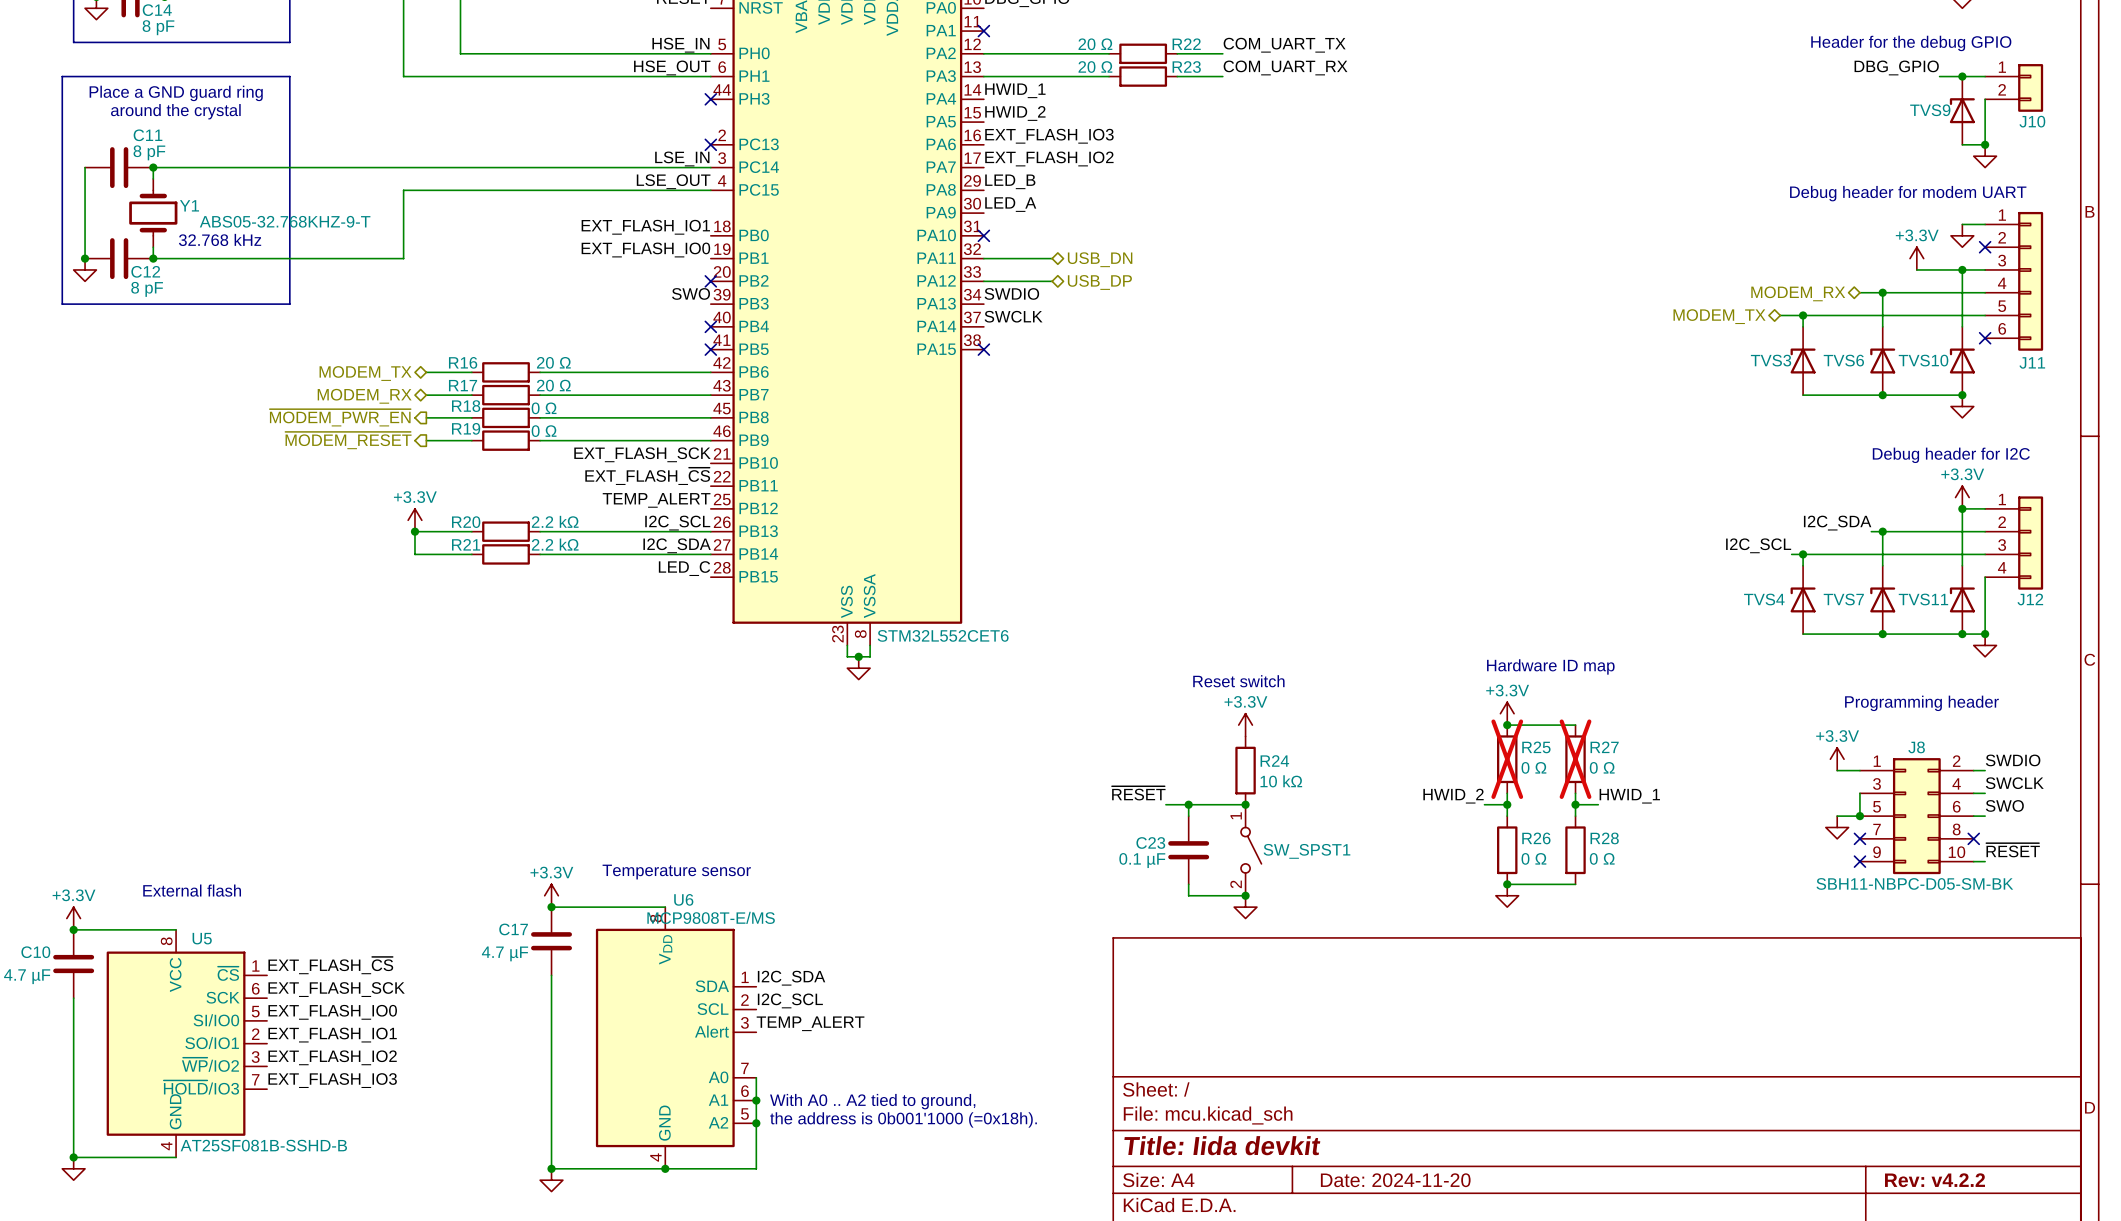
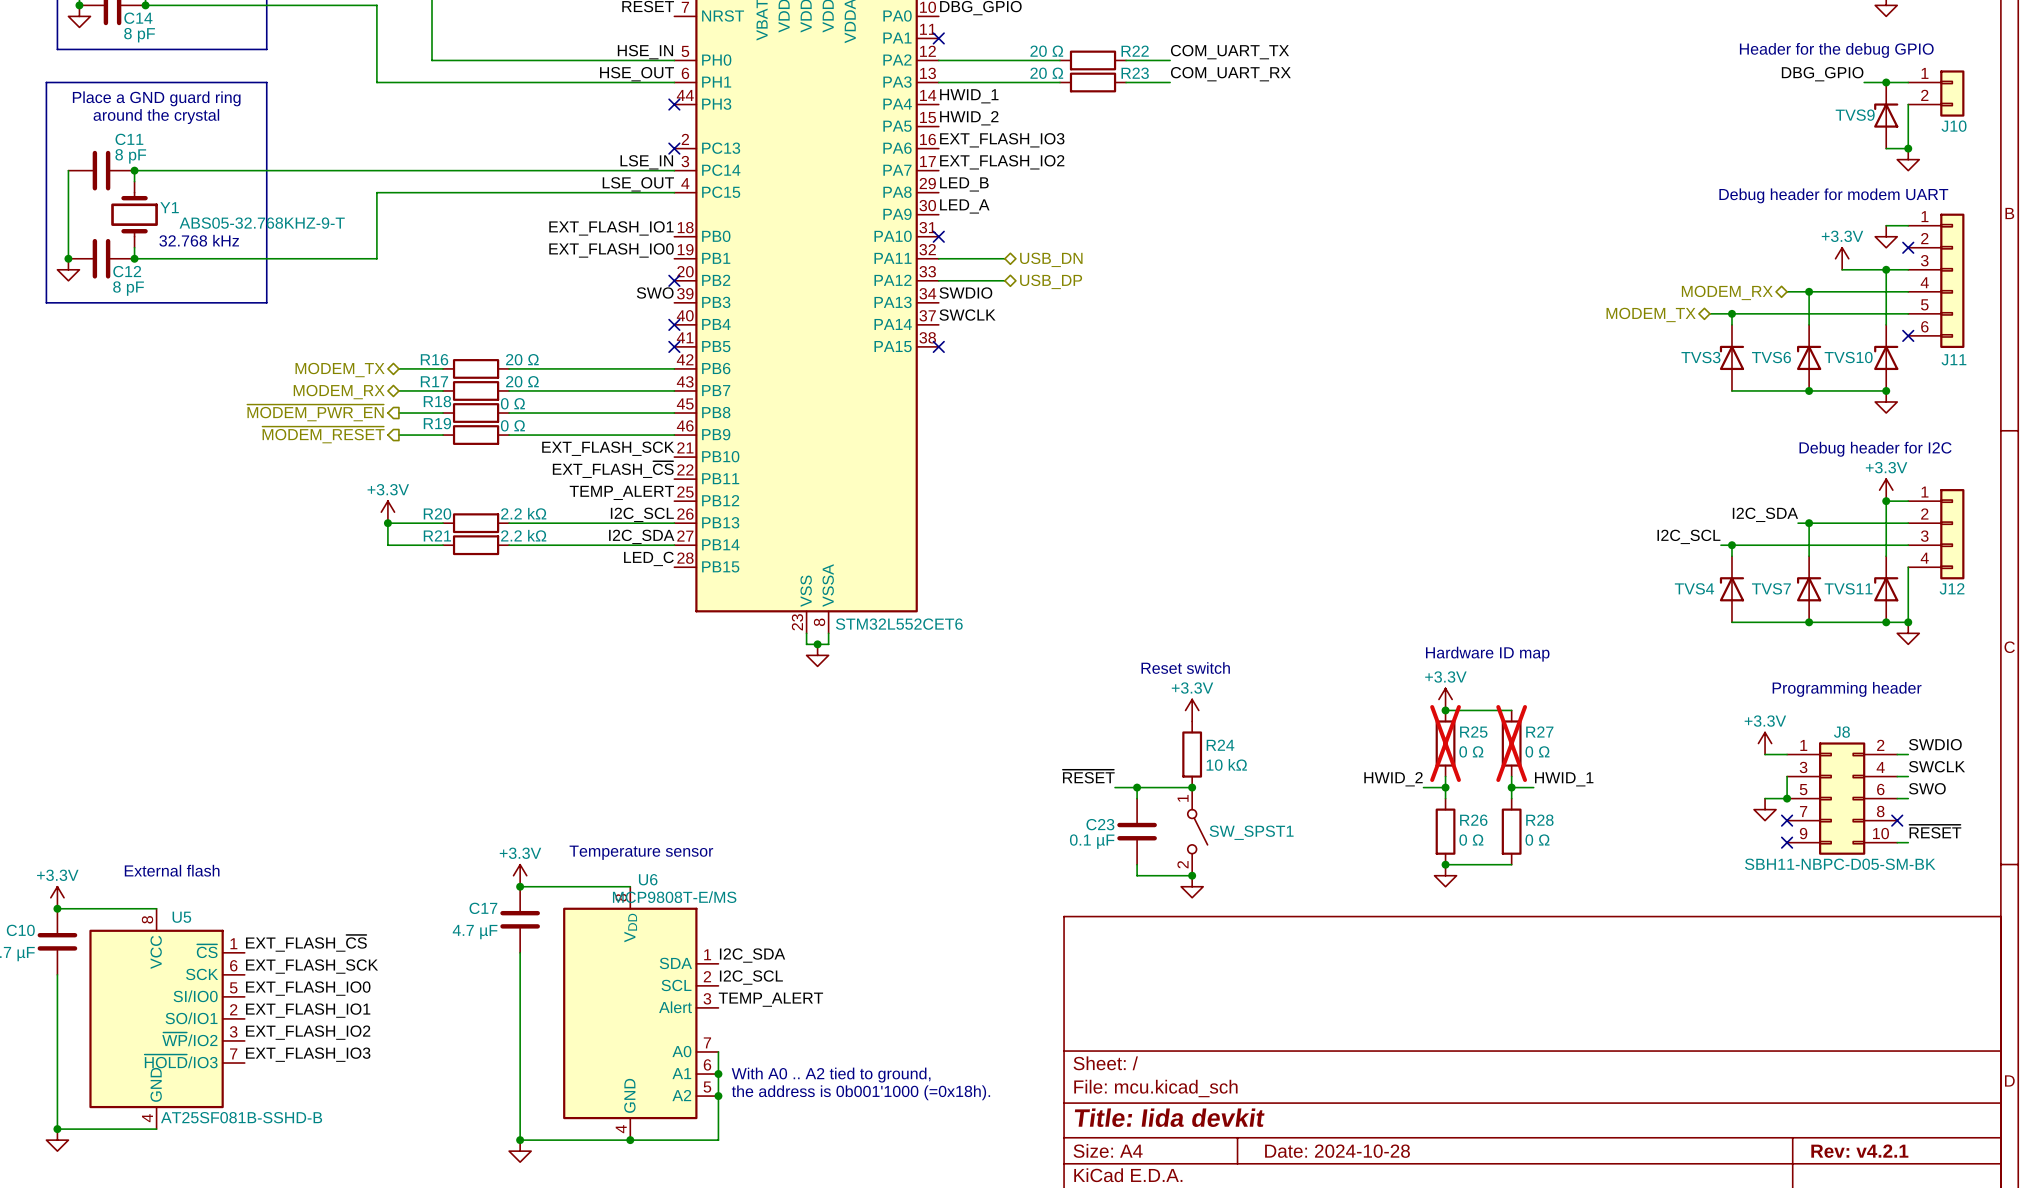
title block: Date: 2024-11-20 (1395, 1180) -> Date: 2024-10-28 (1337, 1151)
title block: Rev: v4.2.2 (1935, 1180) -> Rev: v4.2.1 (1859, 1151)

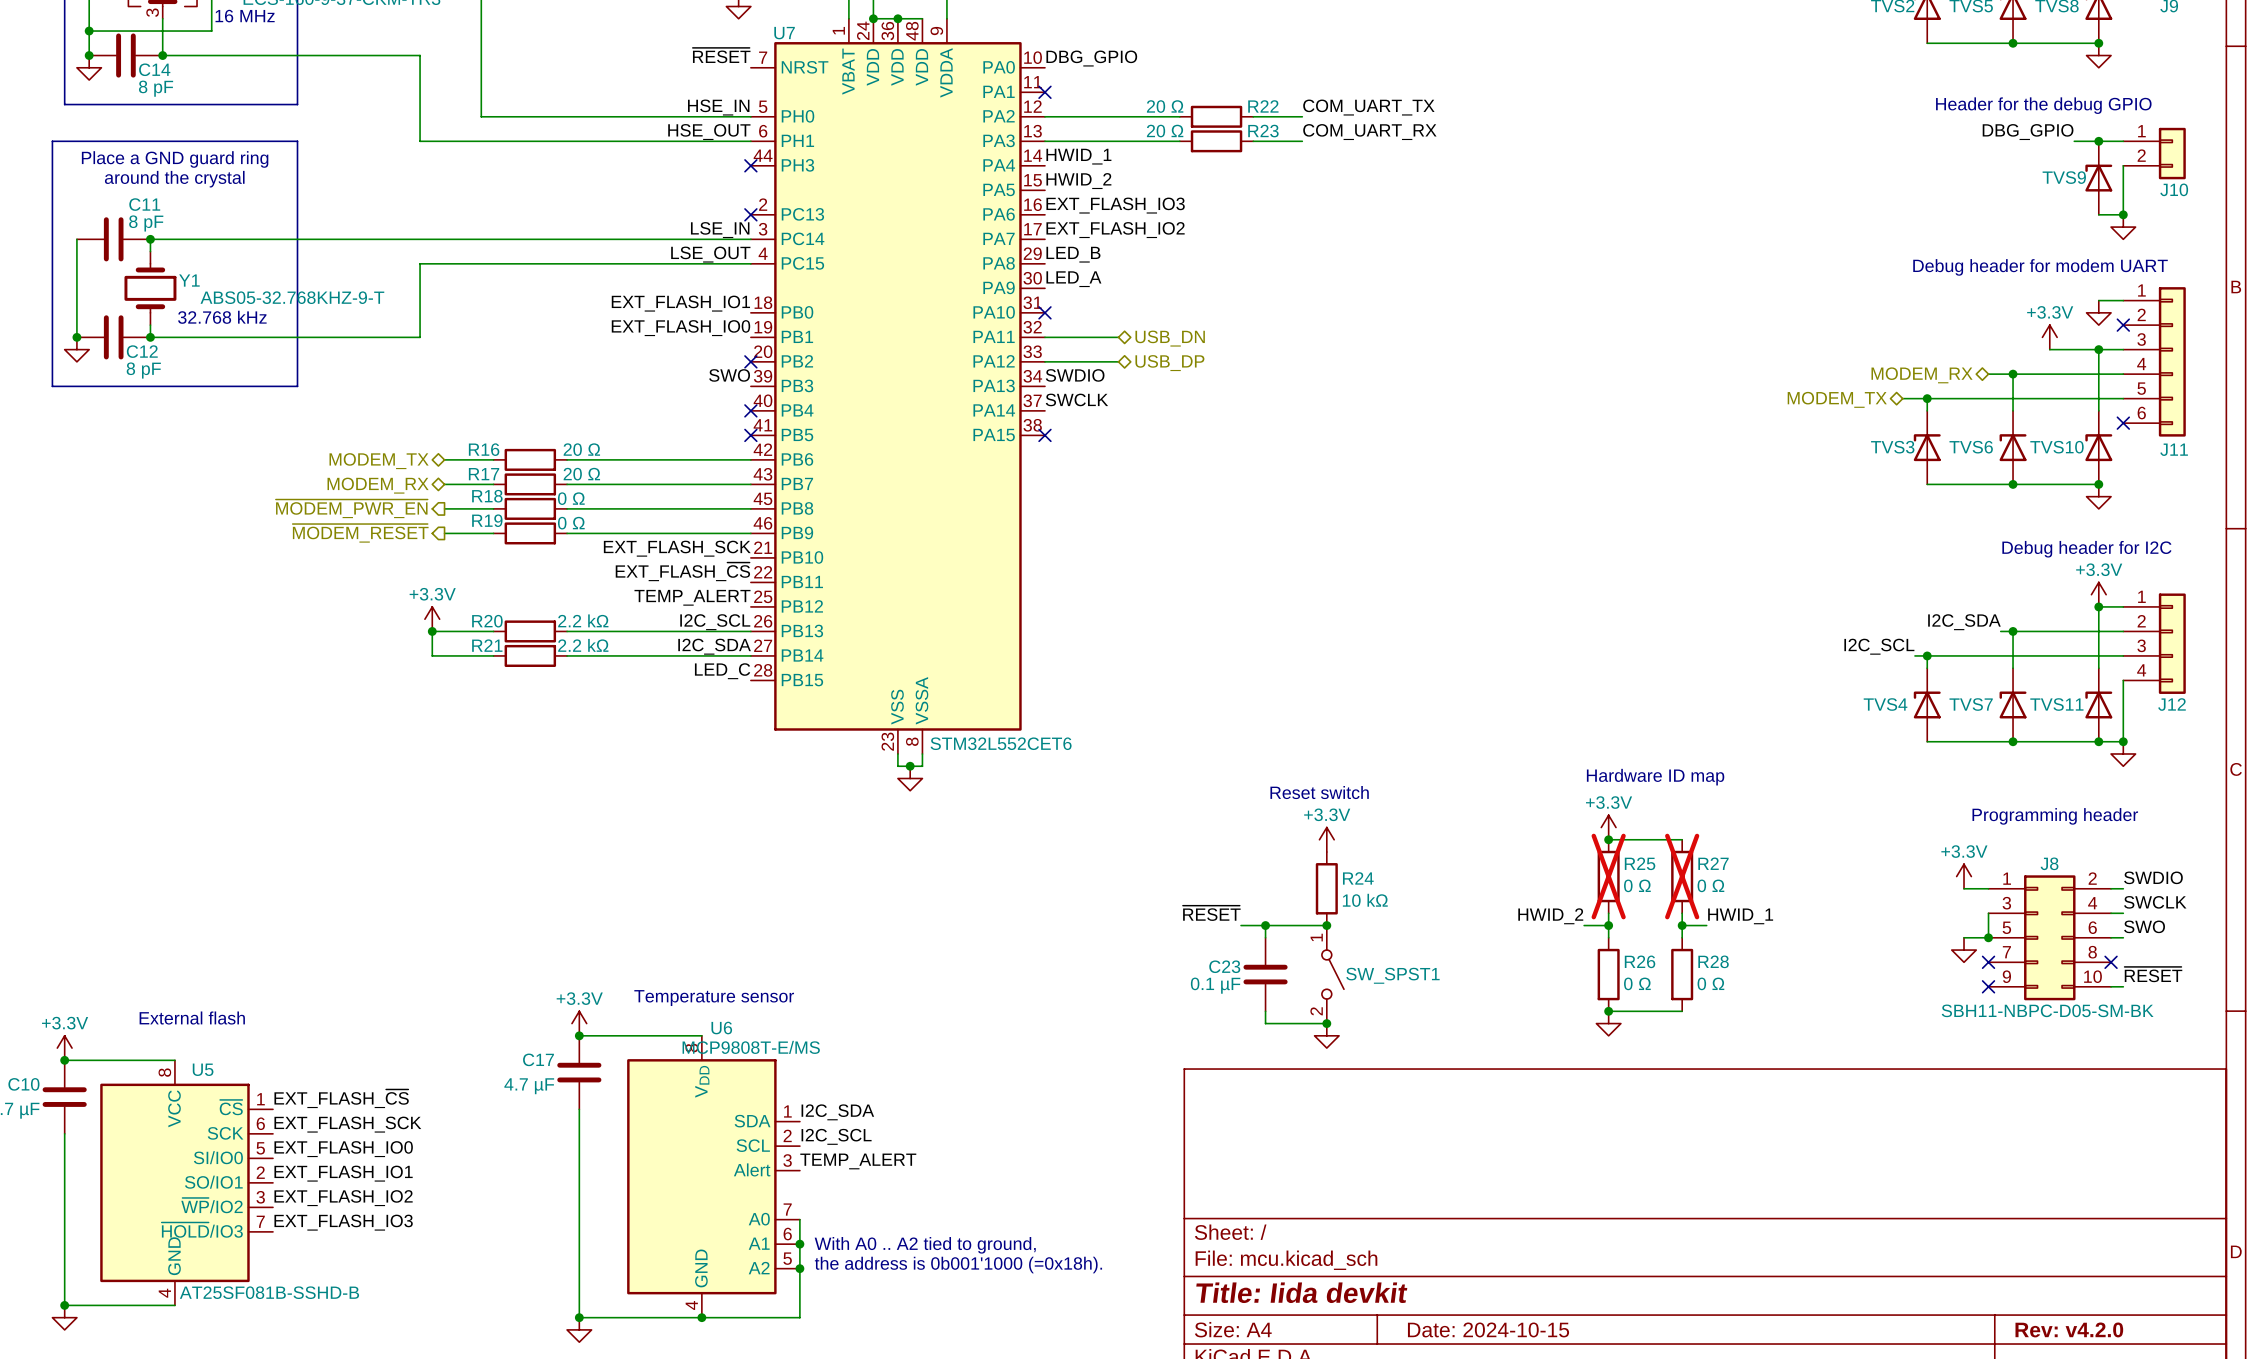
title block: Date: 2024-10-28 (1337, 1151) -> Date: 2024-10-15 (1488, 1329)
title block: Rev: v4.2.1 (1859, 1151) -> Rev: v4.2.0 (2069, 1329)

